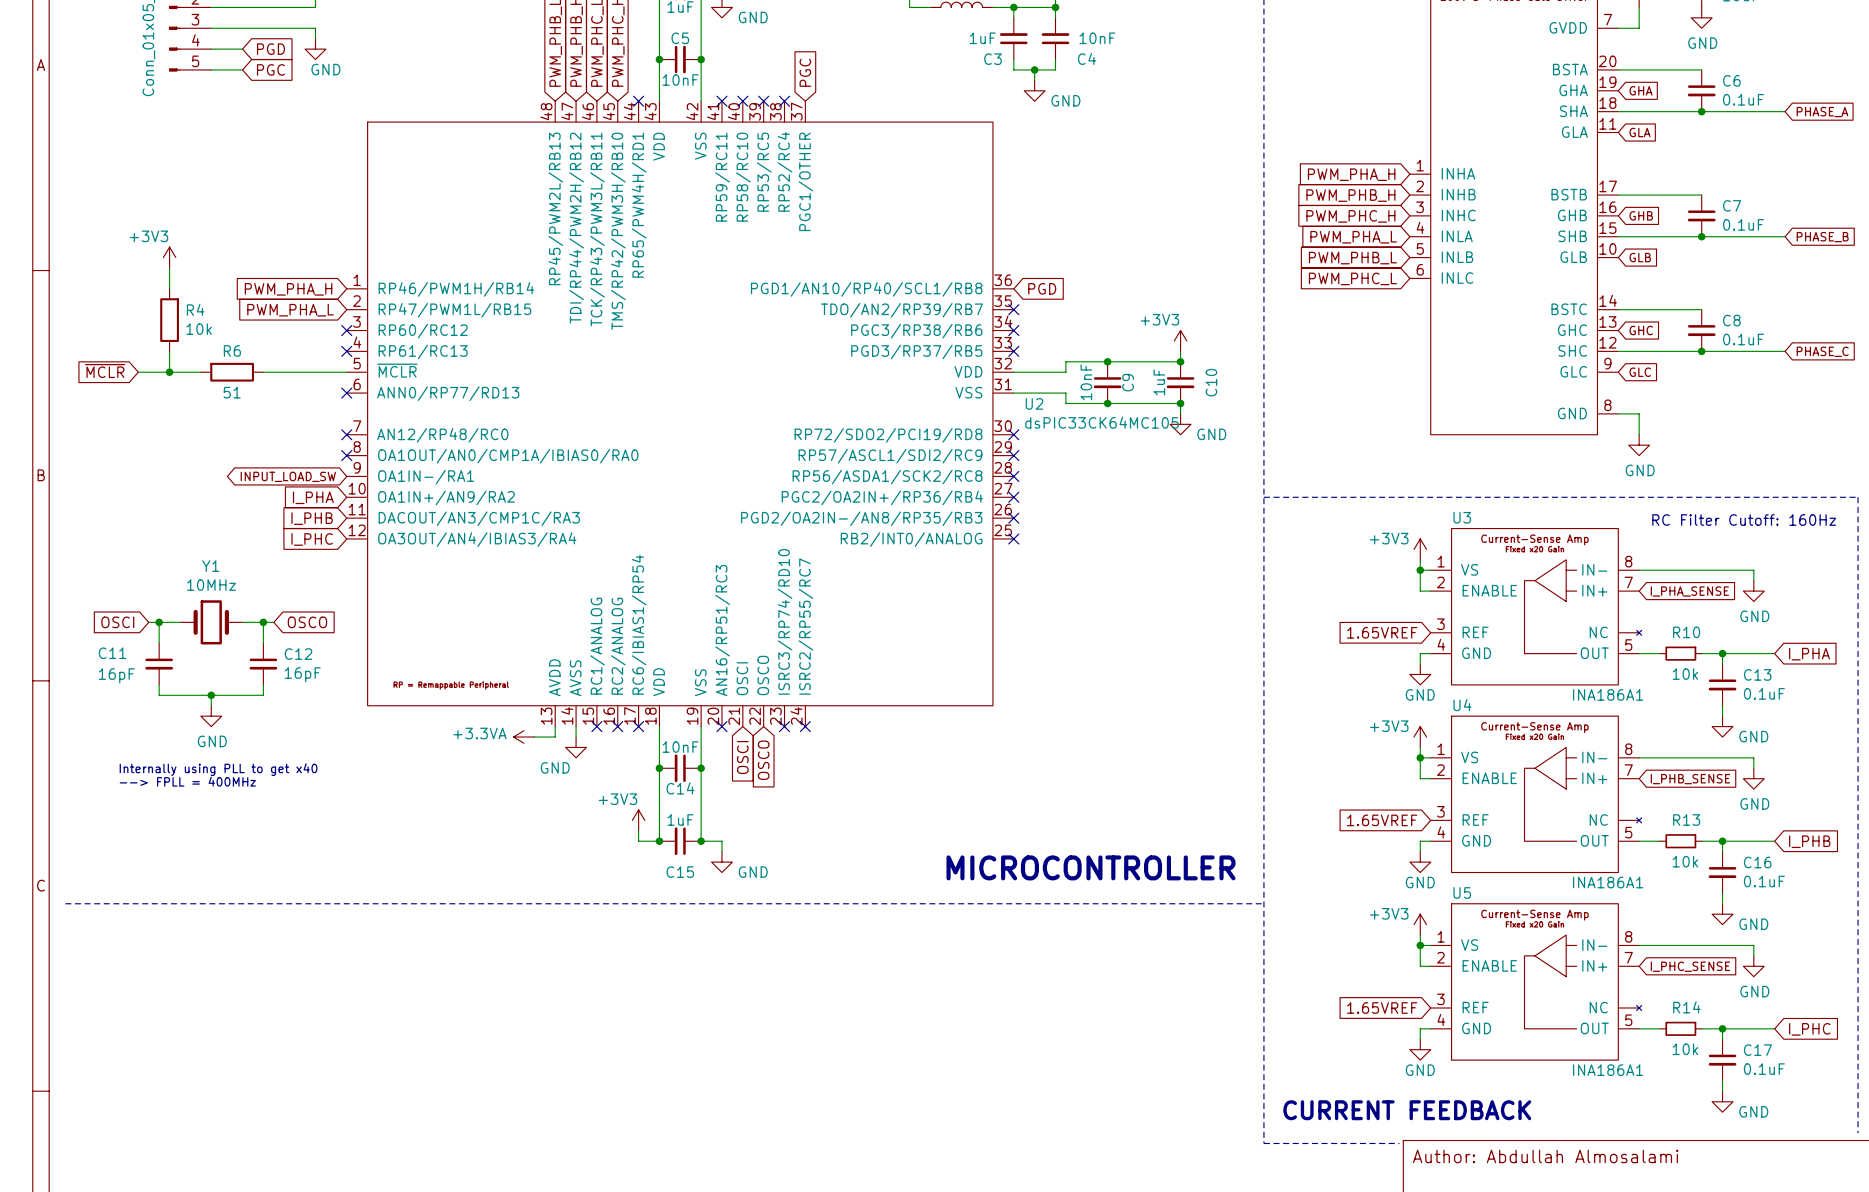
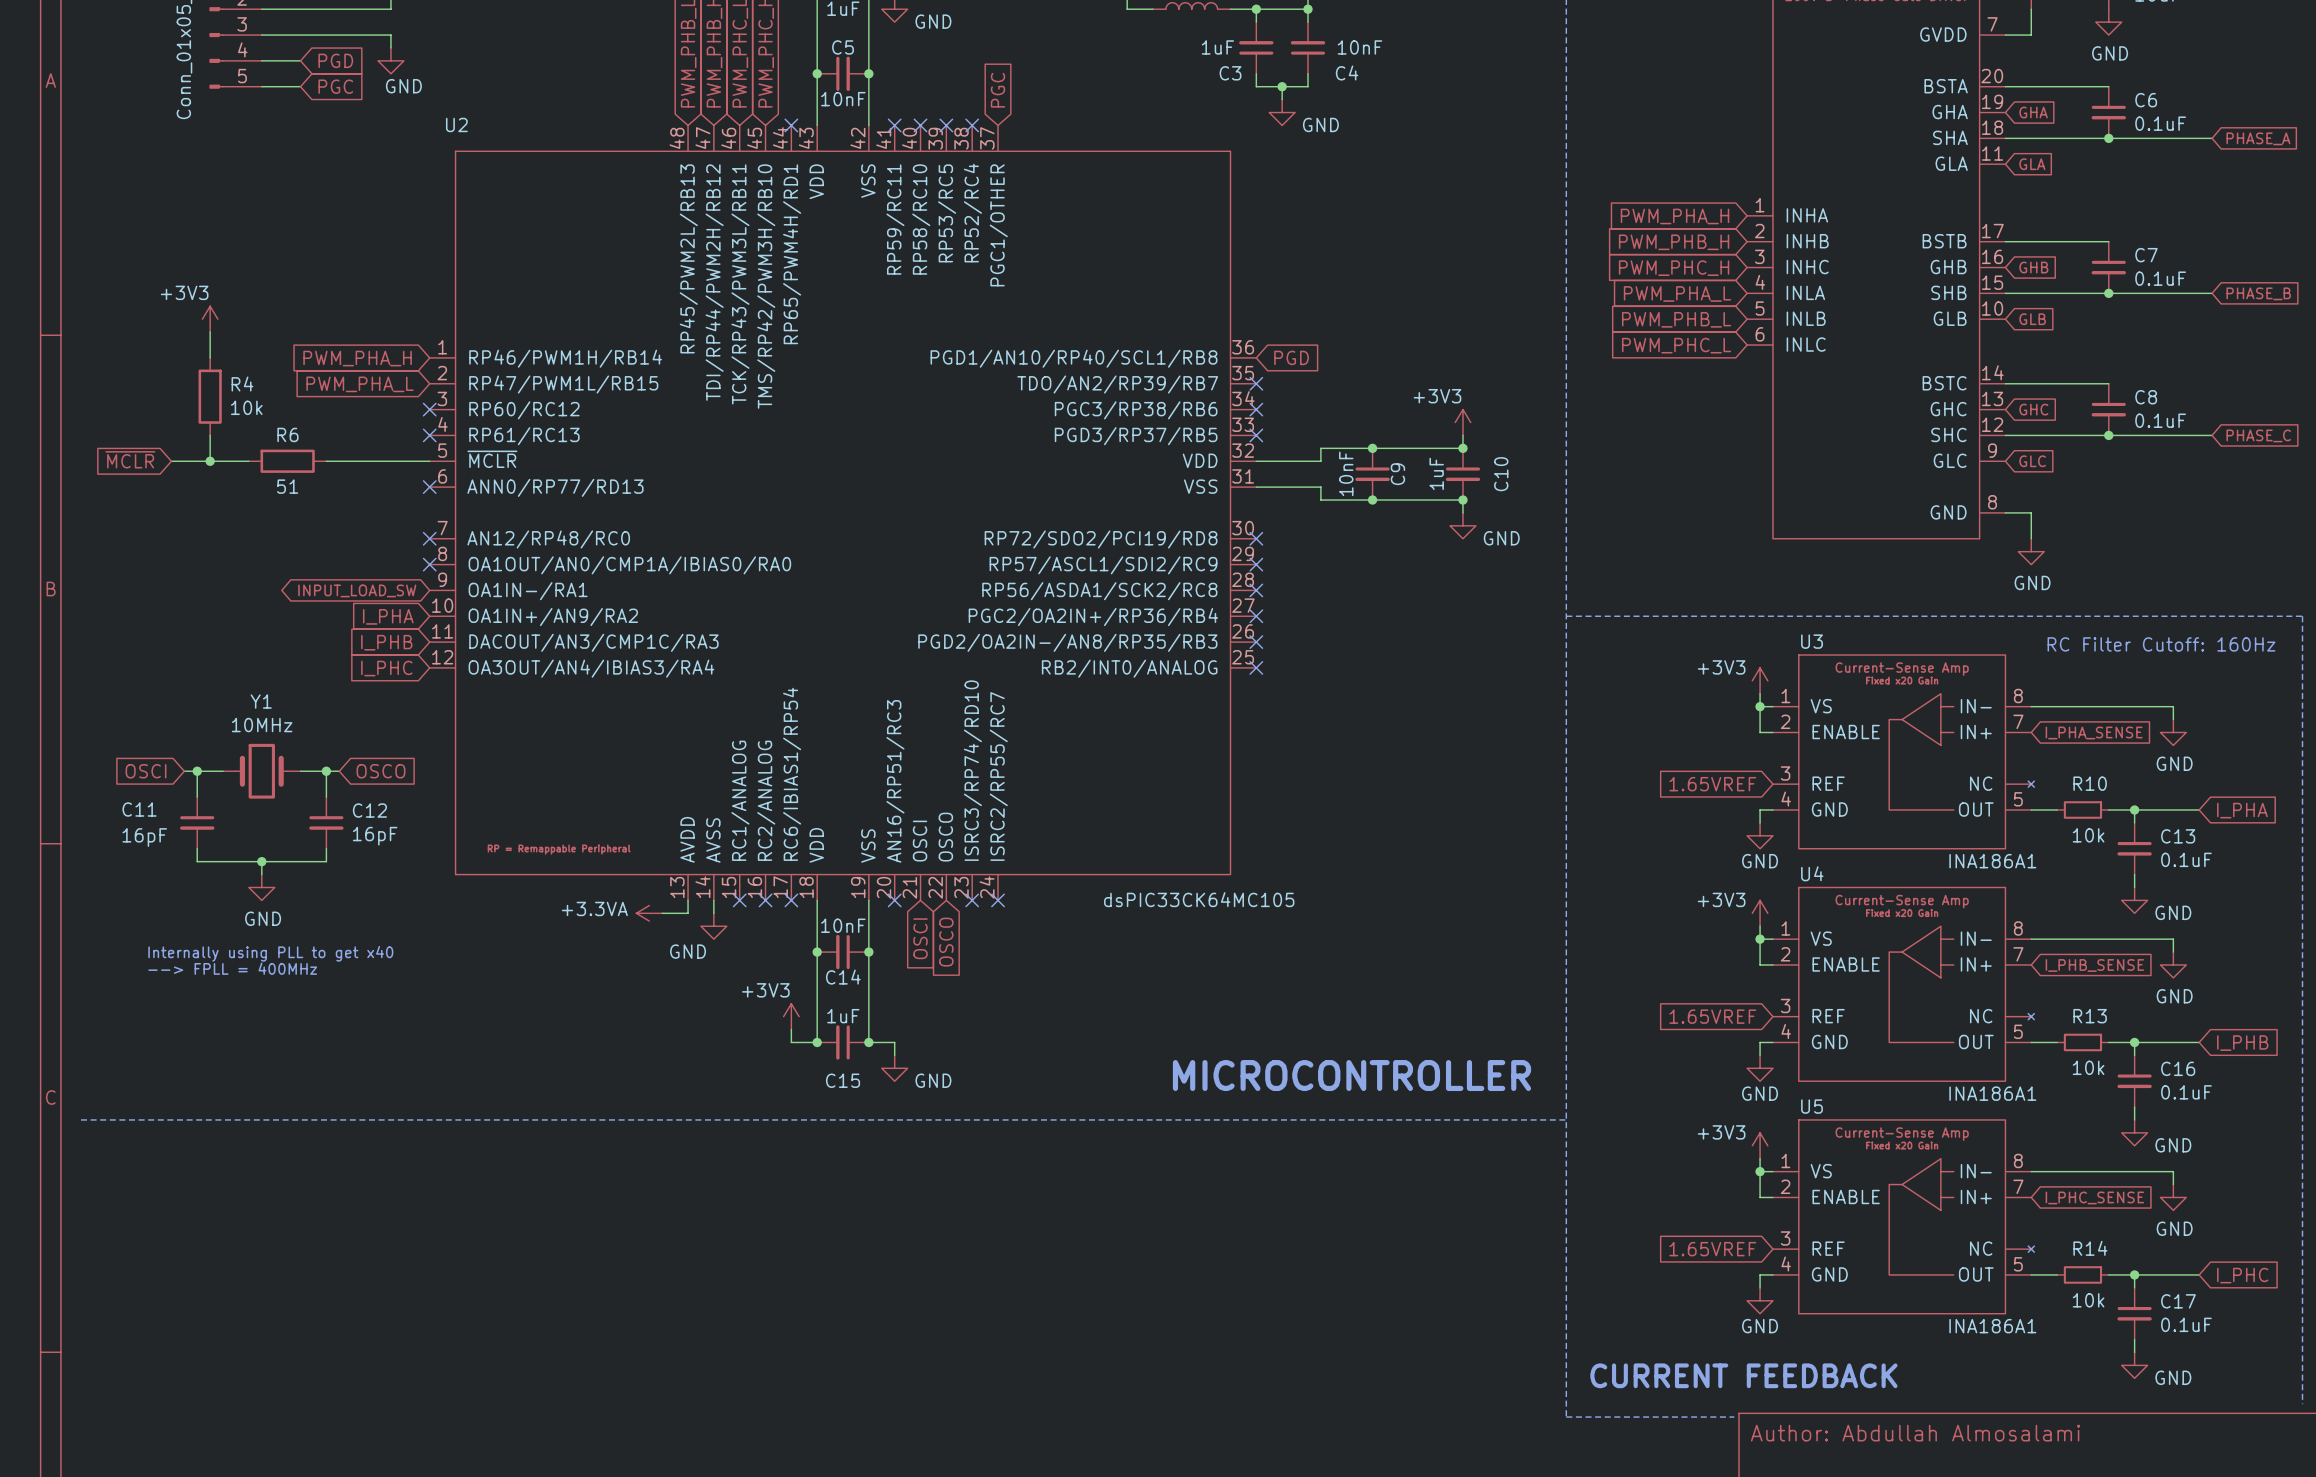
U2 name position: U2 (1034, 403) -> U2 (456, 124)
U2 value position: dsPIC33CK64MC105 (1101, 422) -> dsPIC33CK64MC105 (1199, 899)

